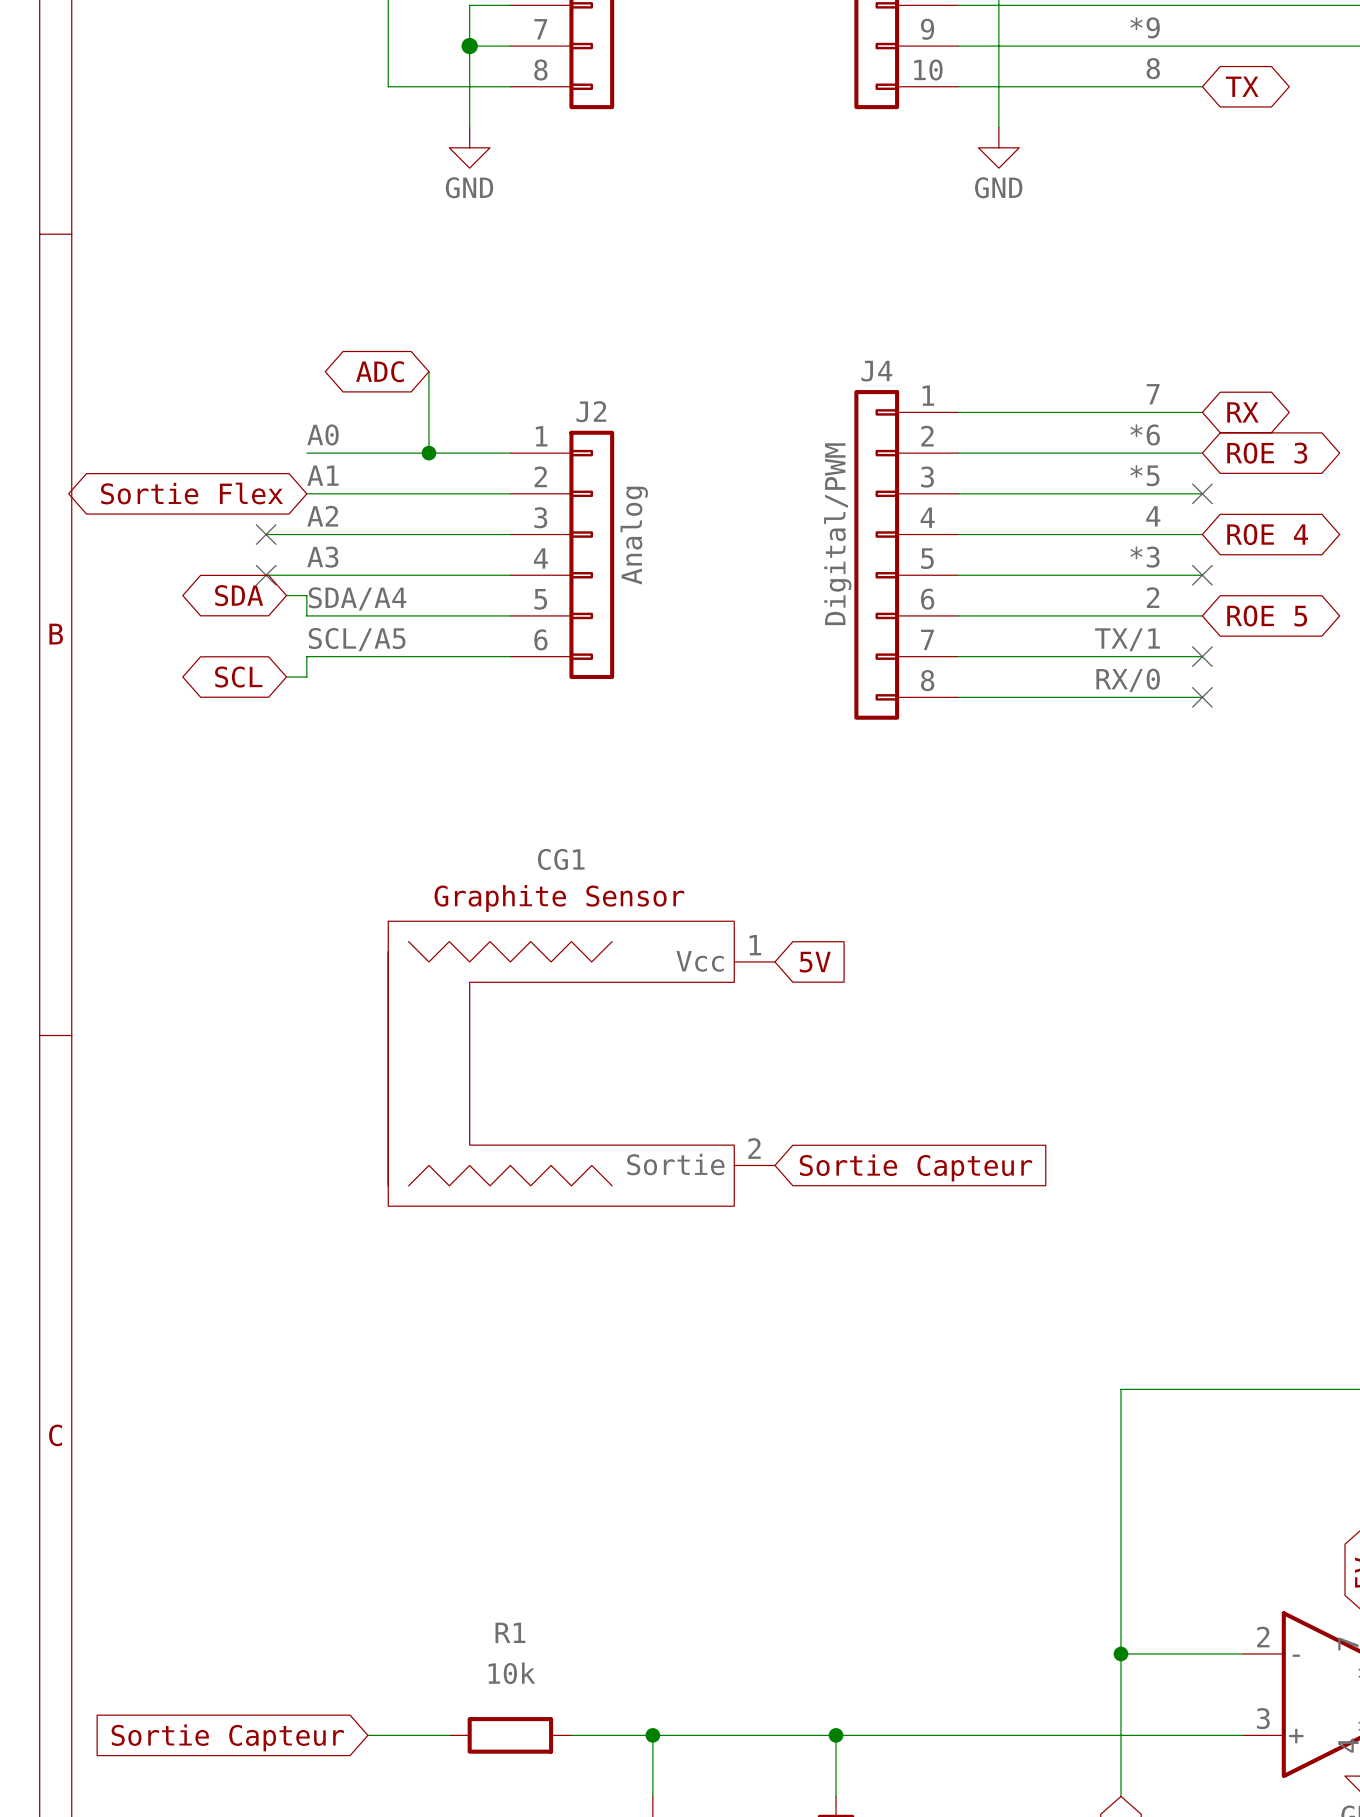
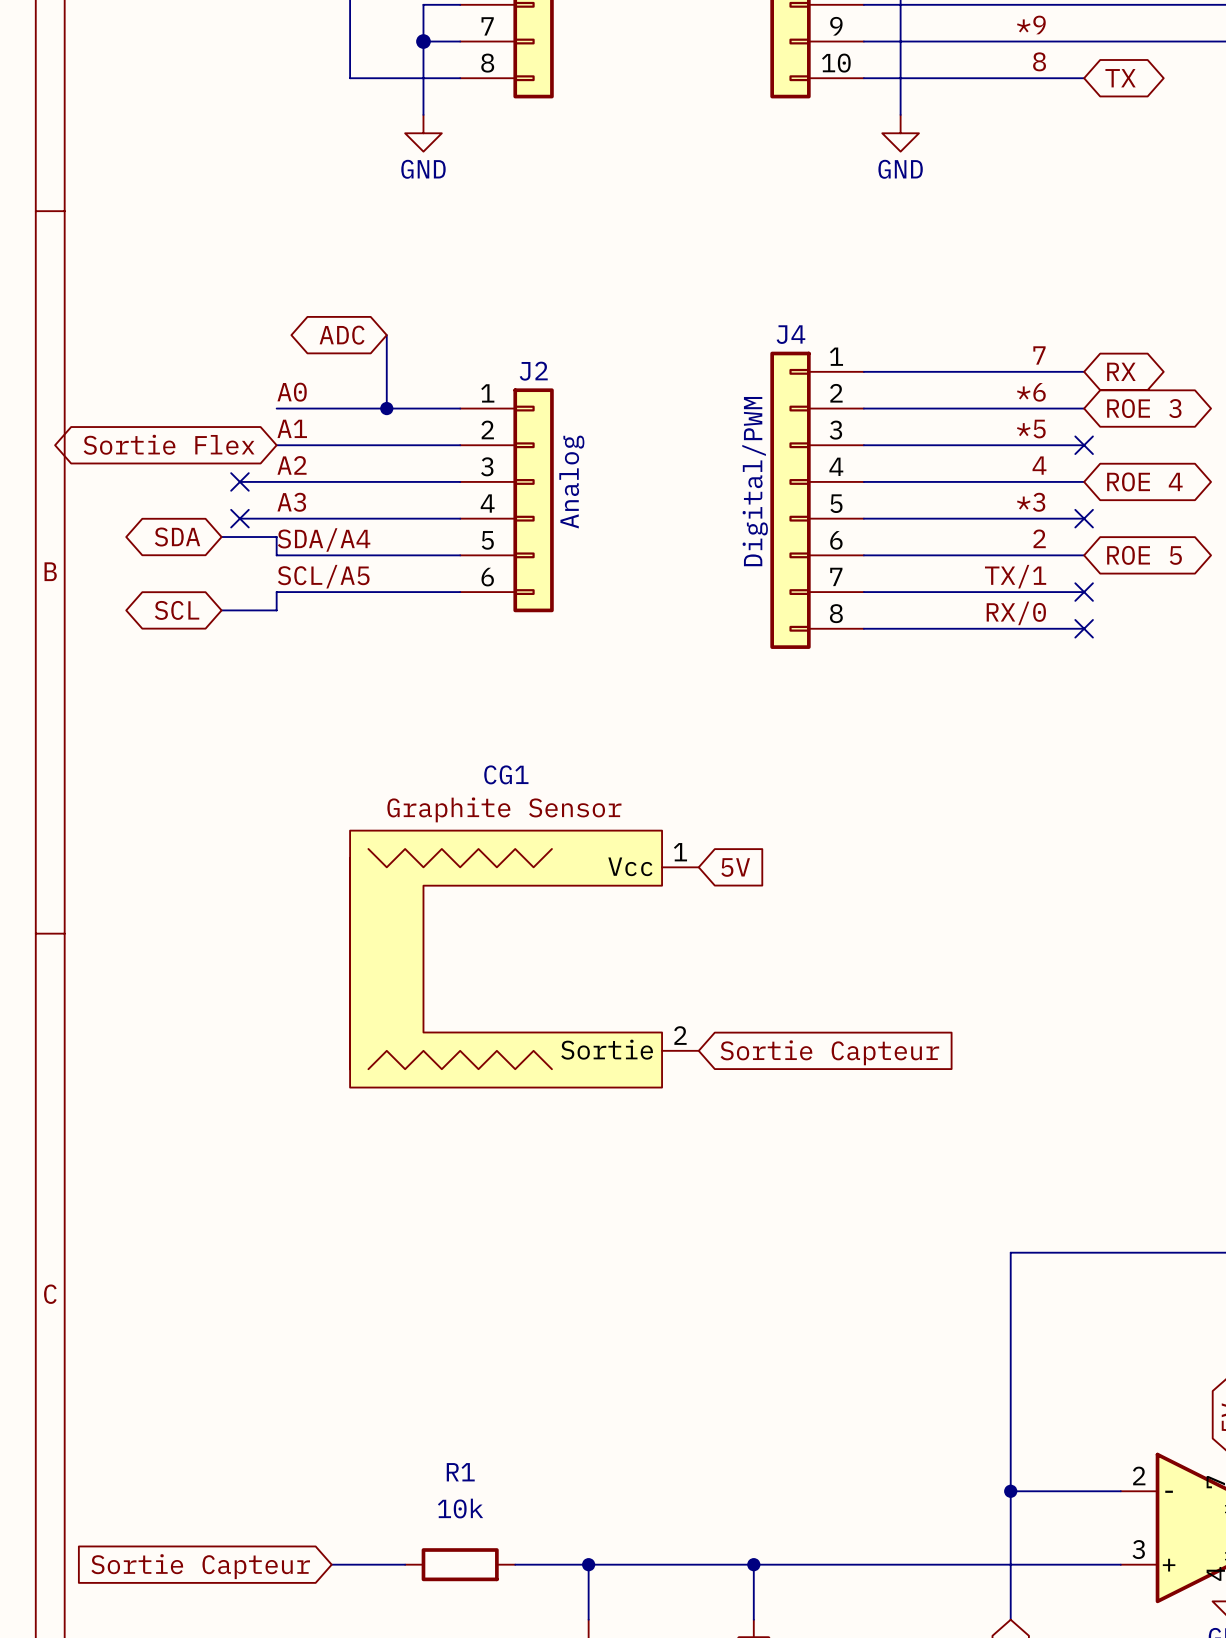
global label position: SDA (239, 595) -> SDA (177, 537)
wire: none -> (221, 537) (258, 537)
global label position: SCL (238, 677) -> SCL (177, 610)
wire: none -> (221, 610) (258, 610)

